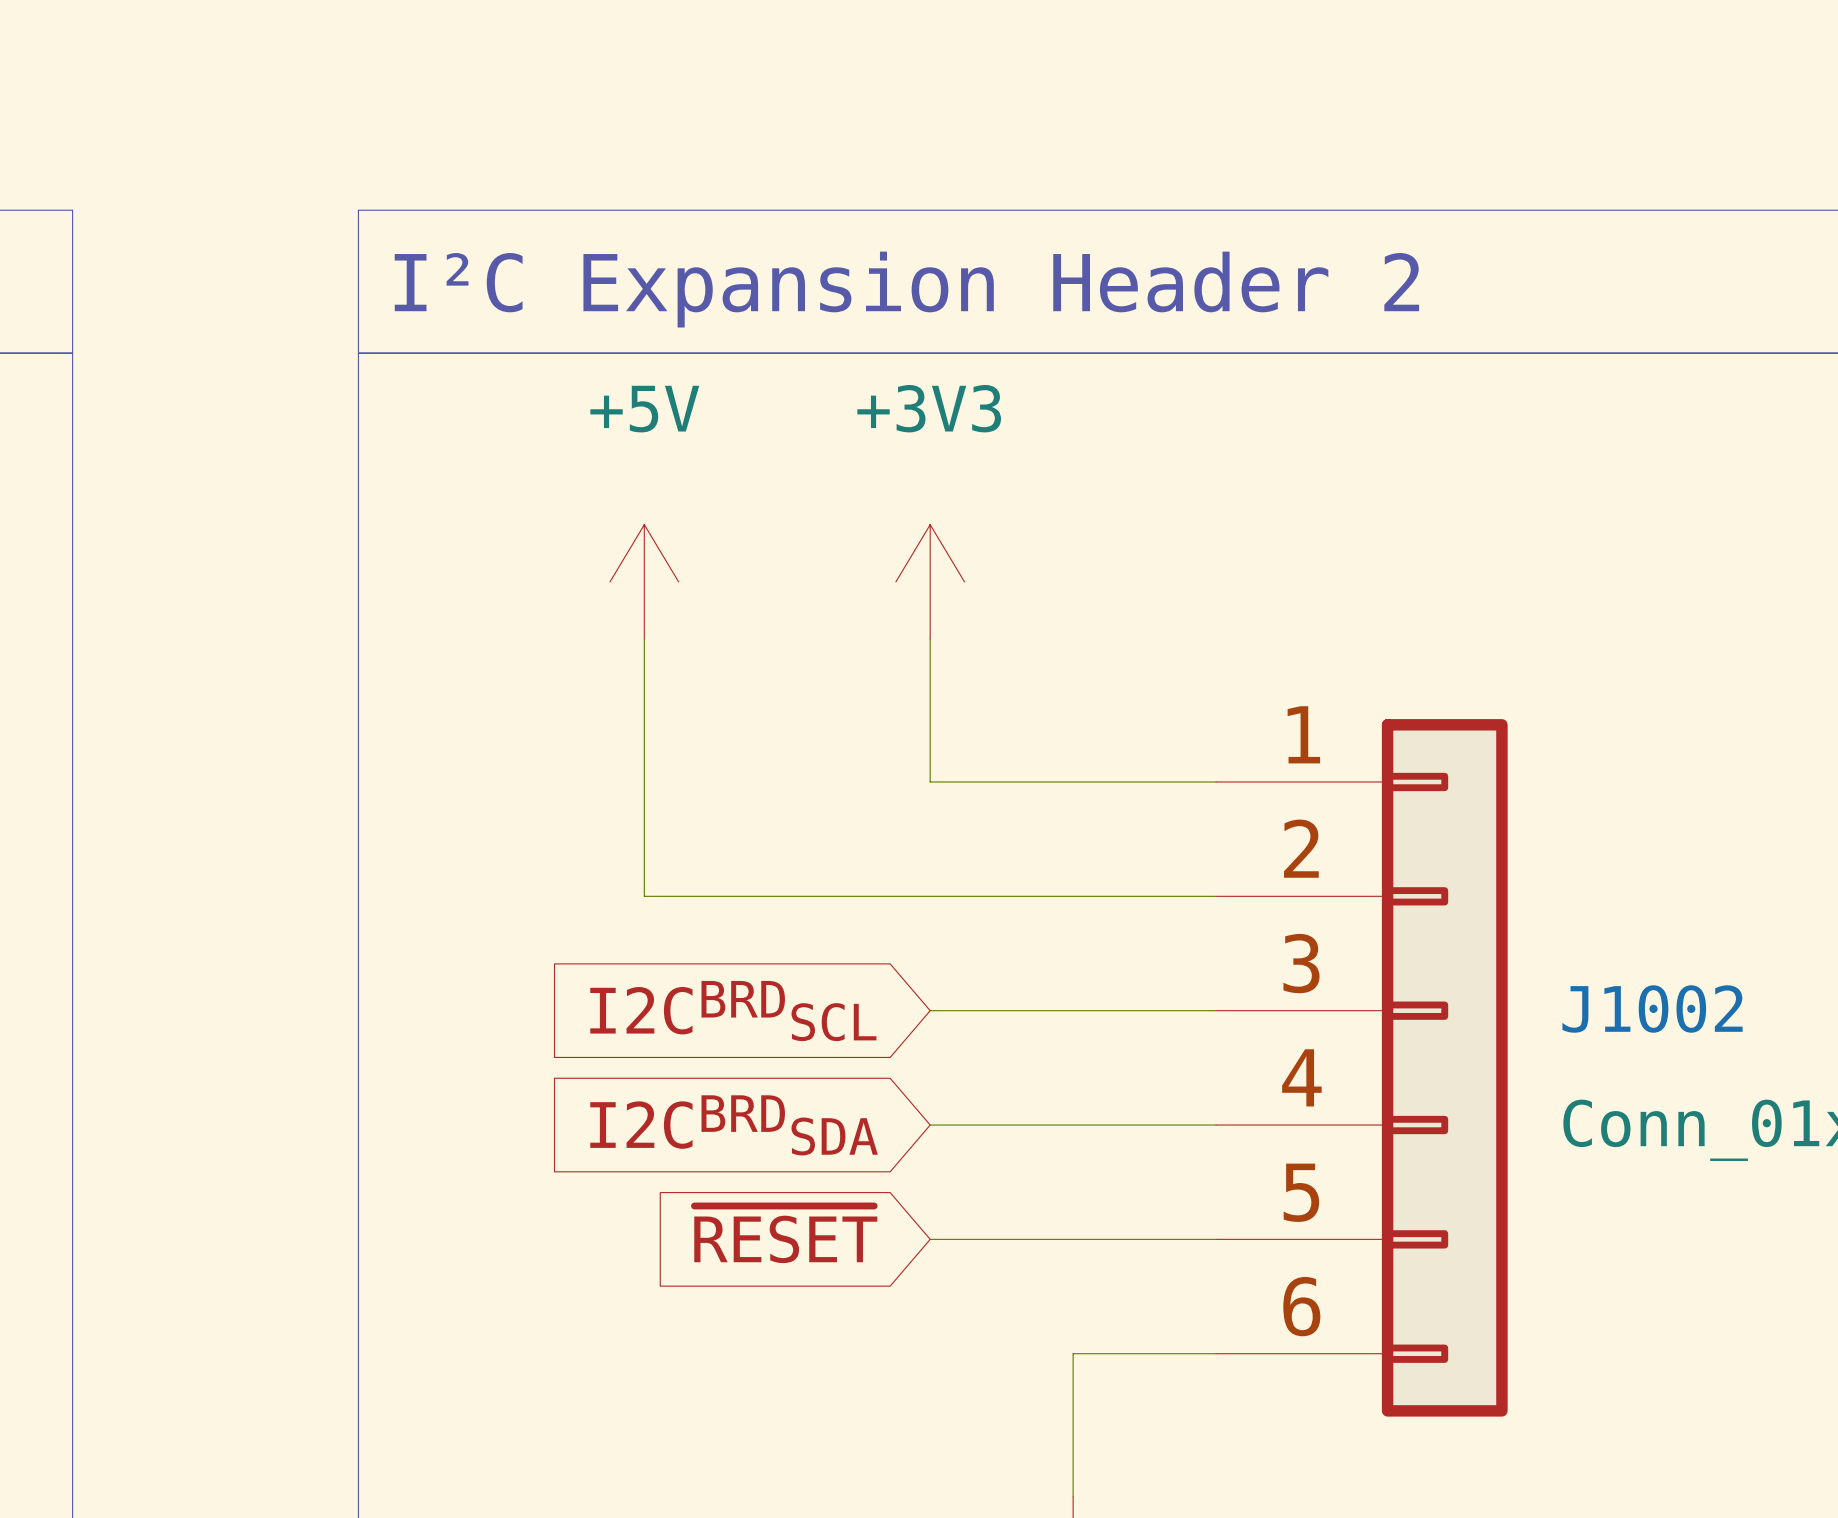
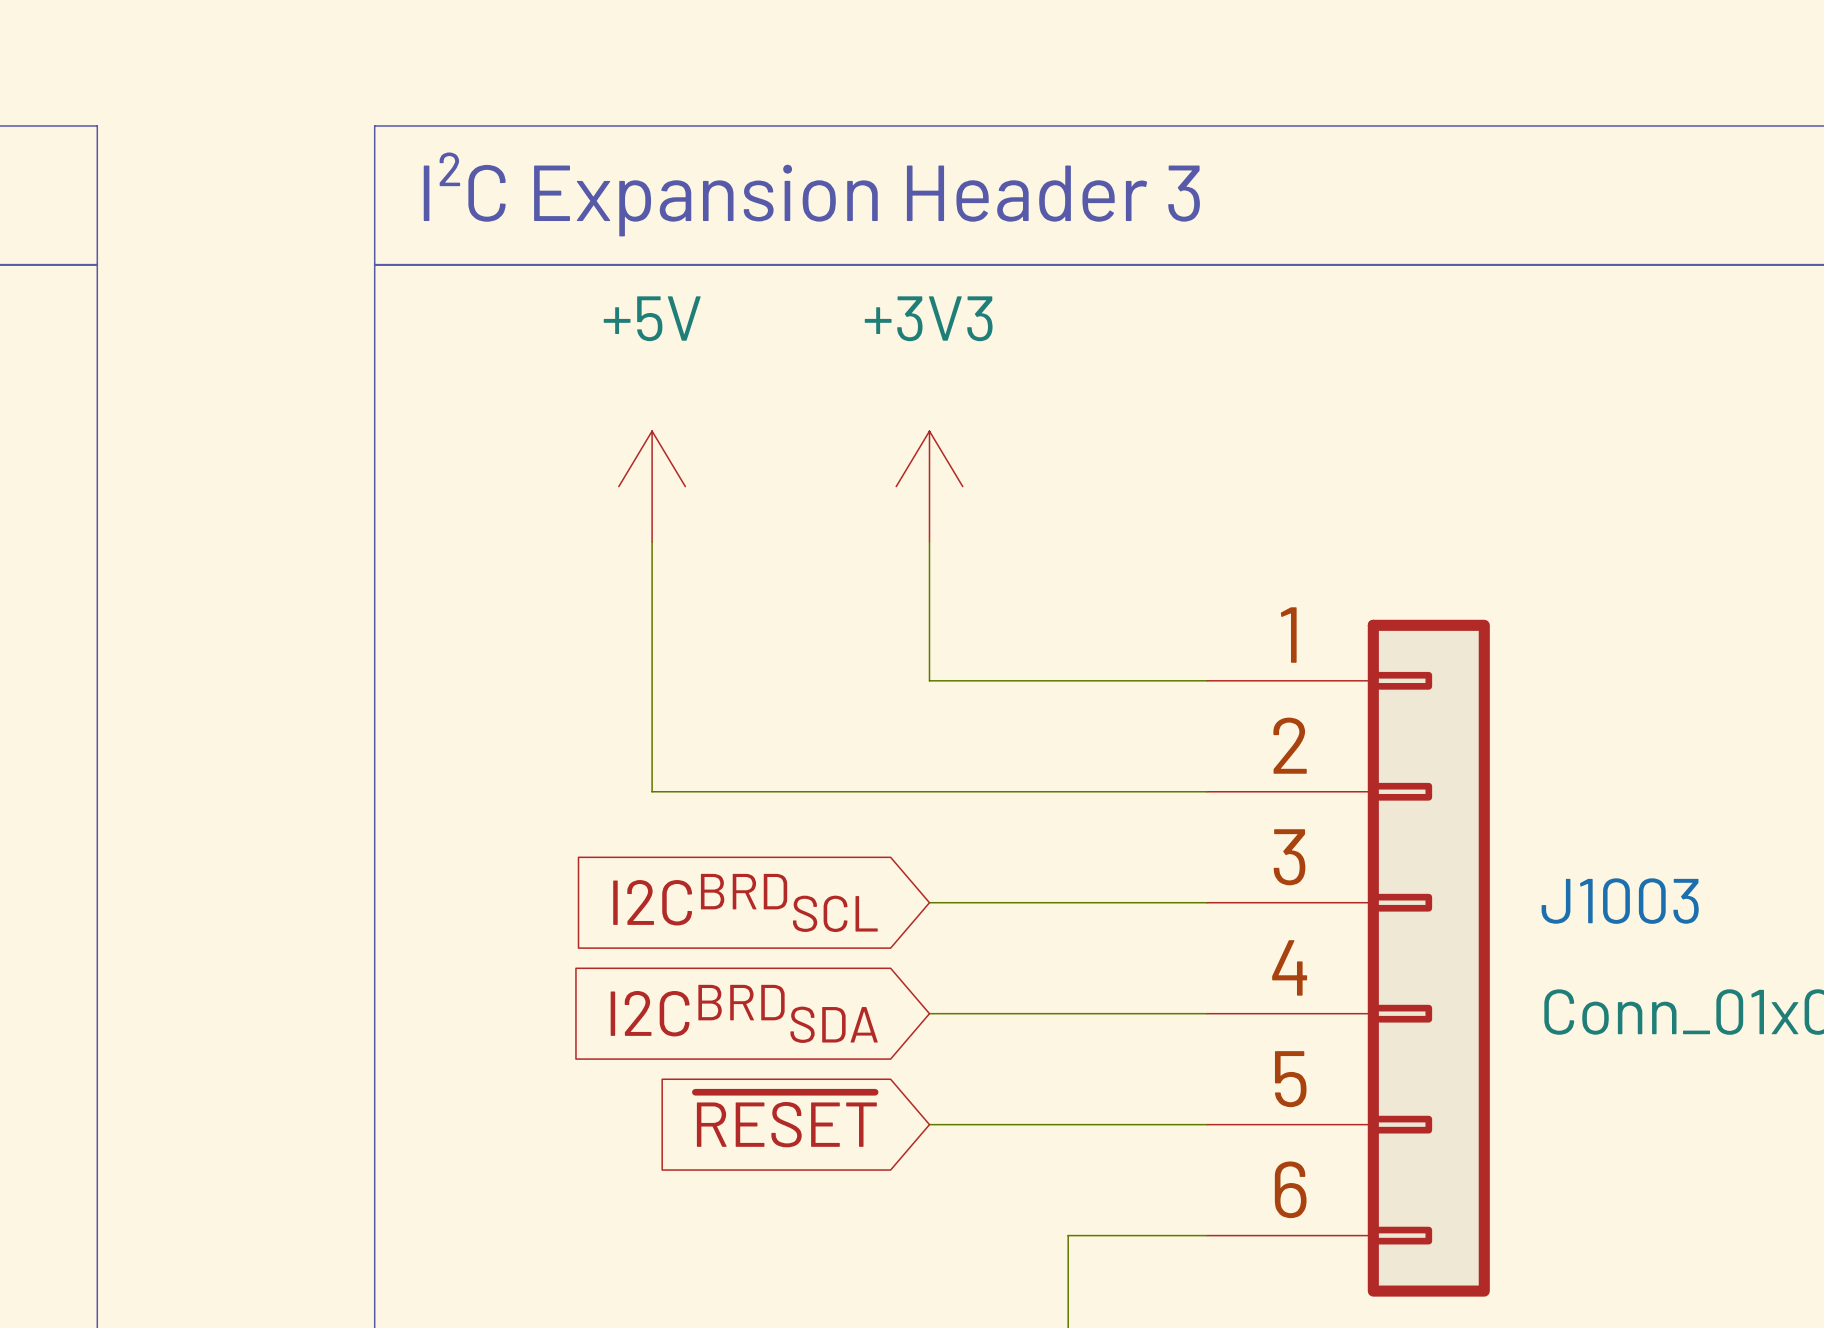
text: I²C Expansion Header 2 (906, 289) -> I²C Expansion Header 3 (811, 194)
J1002 name: J1002 (1652, 1009) -> J1003 (1620, 901)

